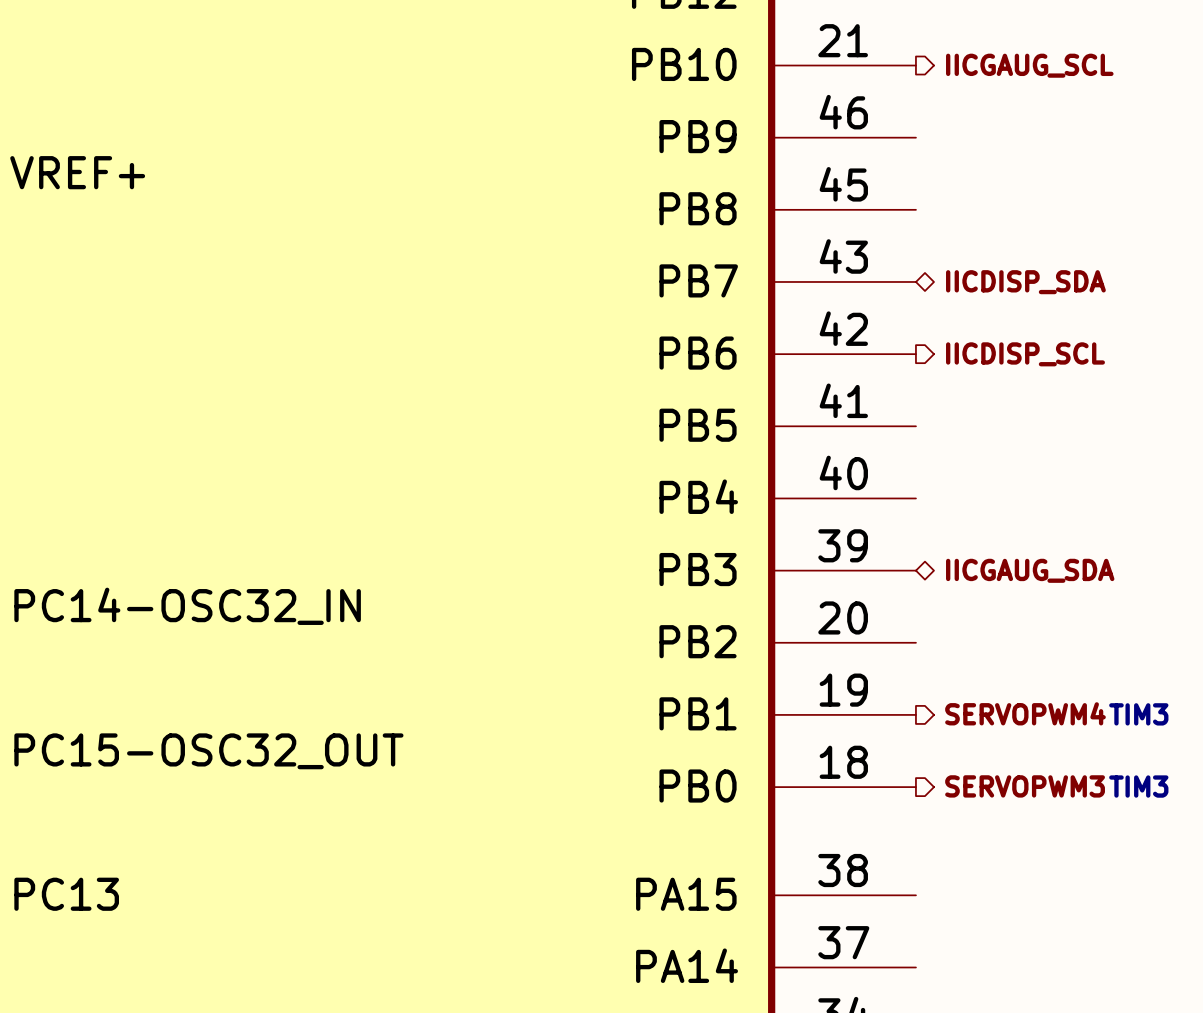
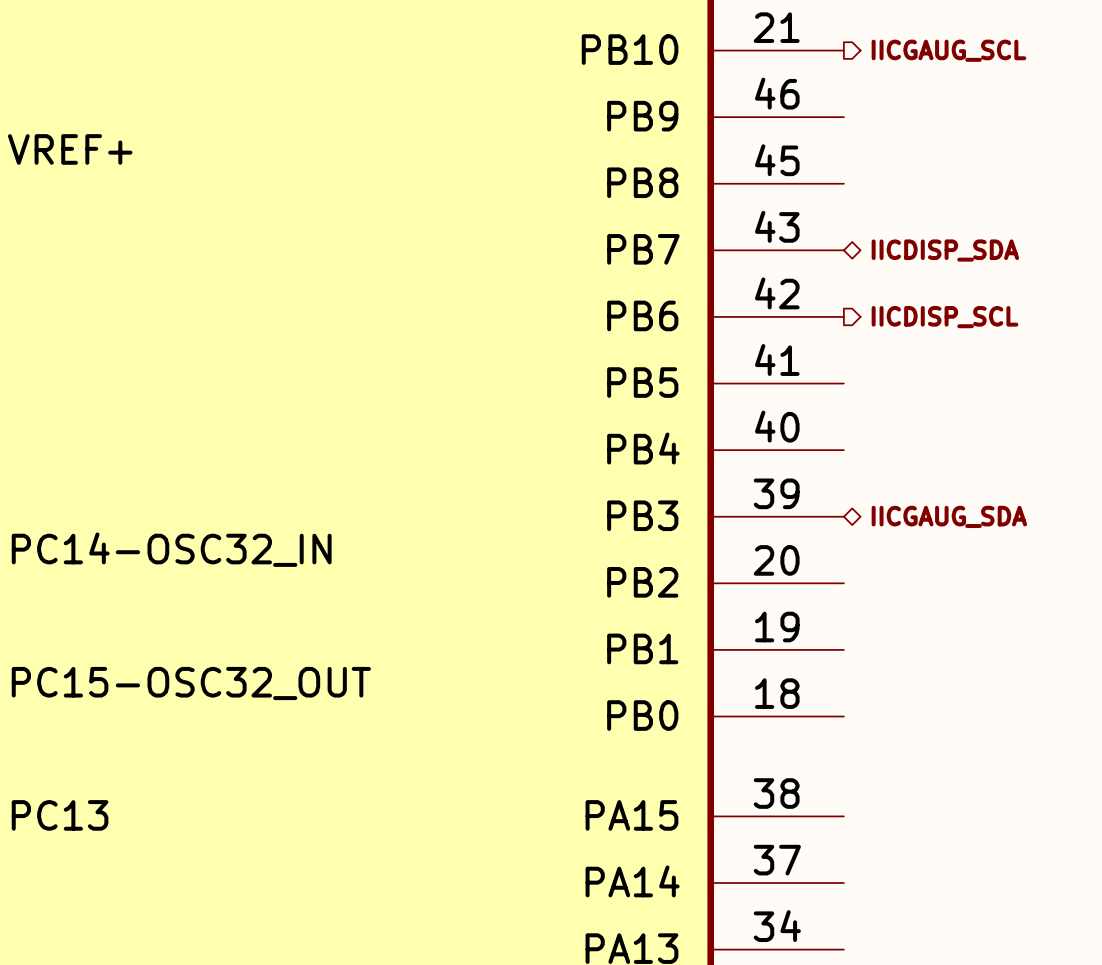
hierarchical label: SERVOPWM4 (1025, 713) -> none
text: TIM3 (1138, 714) -> none
hierarchical label: SERVOPWM3 (1025, 786) -> none
text: TIM3 (1138, 786) -> none

